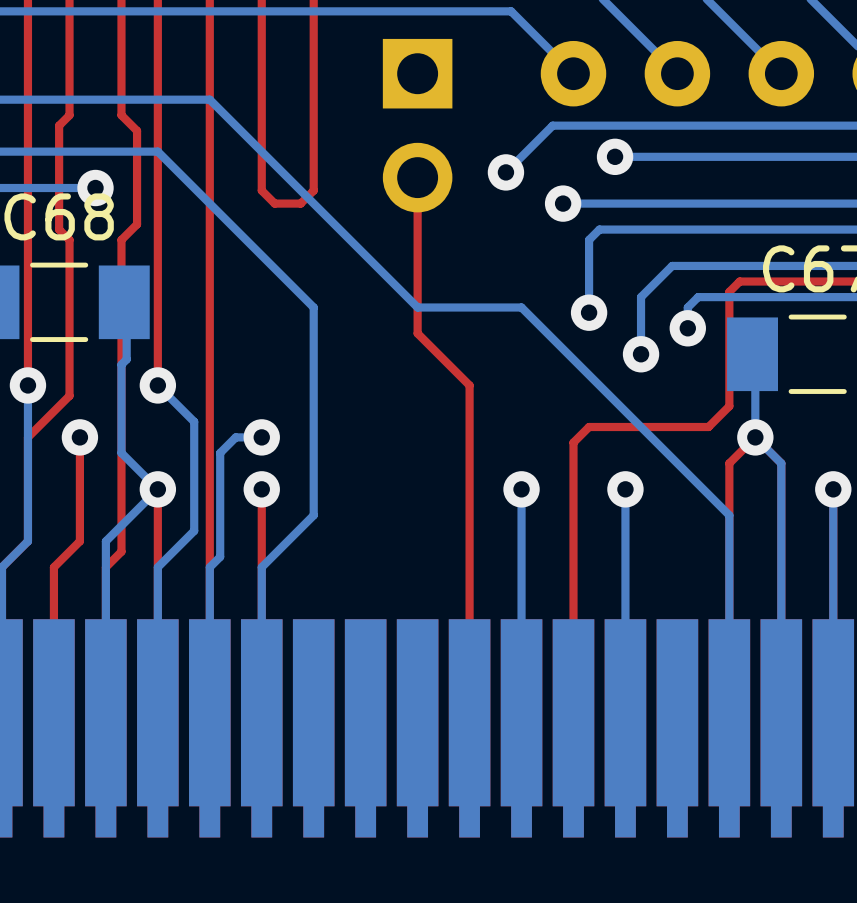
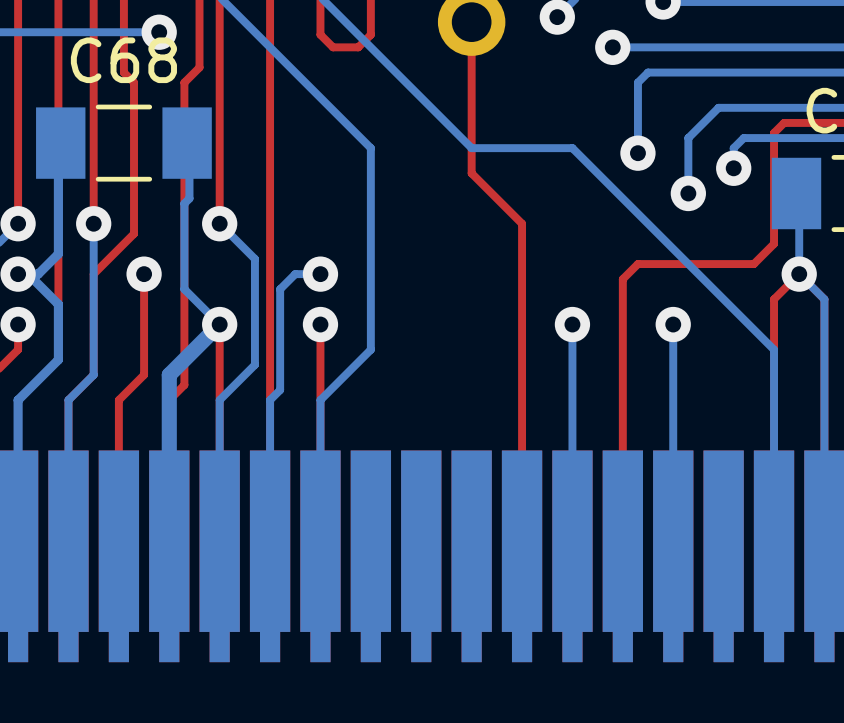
bottom track width: thin (126, 302) (126, 359) (121, 364) (121, 452) (157, 489) (105, 541) (105, 821) -> thick (189, 143) (189, 198) (184, 203) (184, 289) (219, 324) (169, 374) (169, 647)

